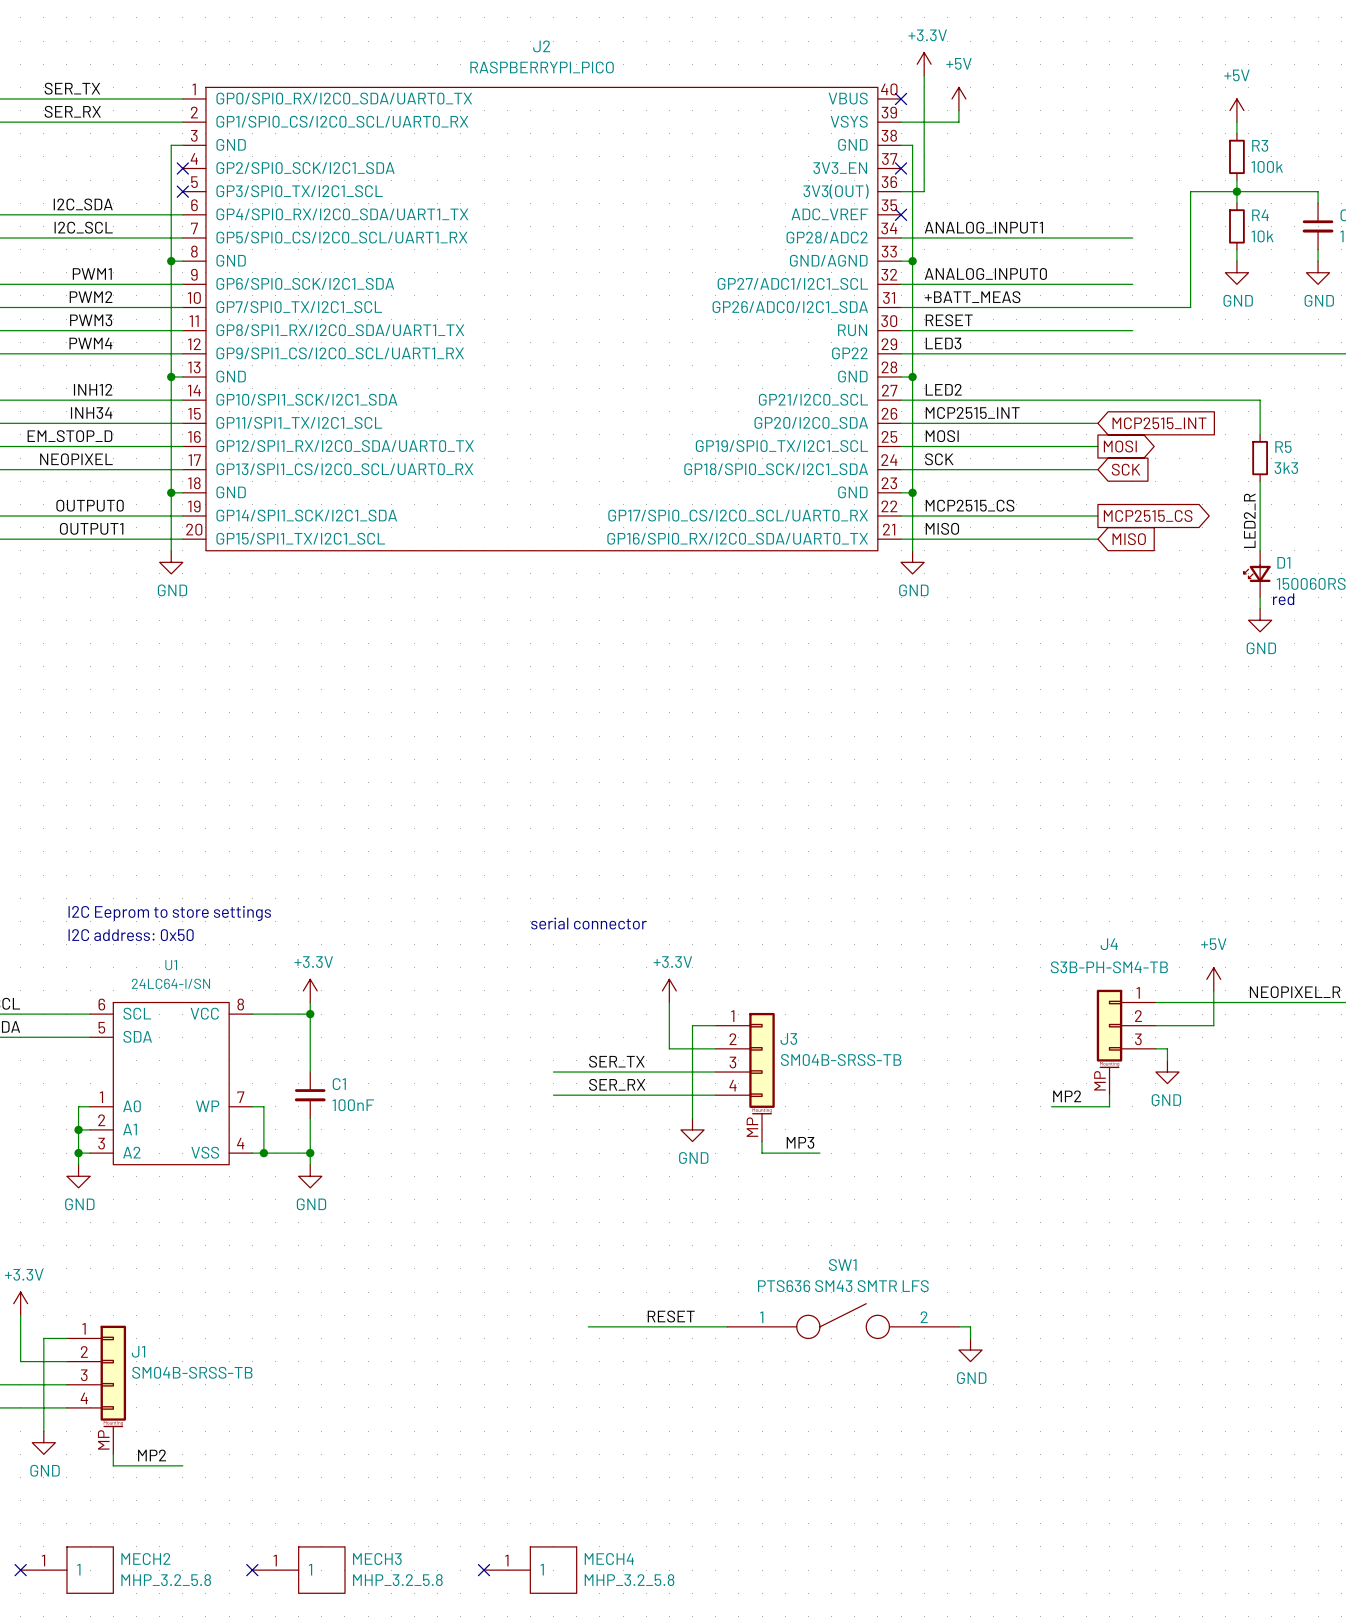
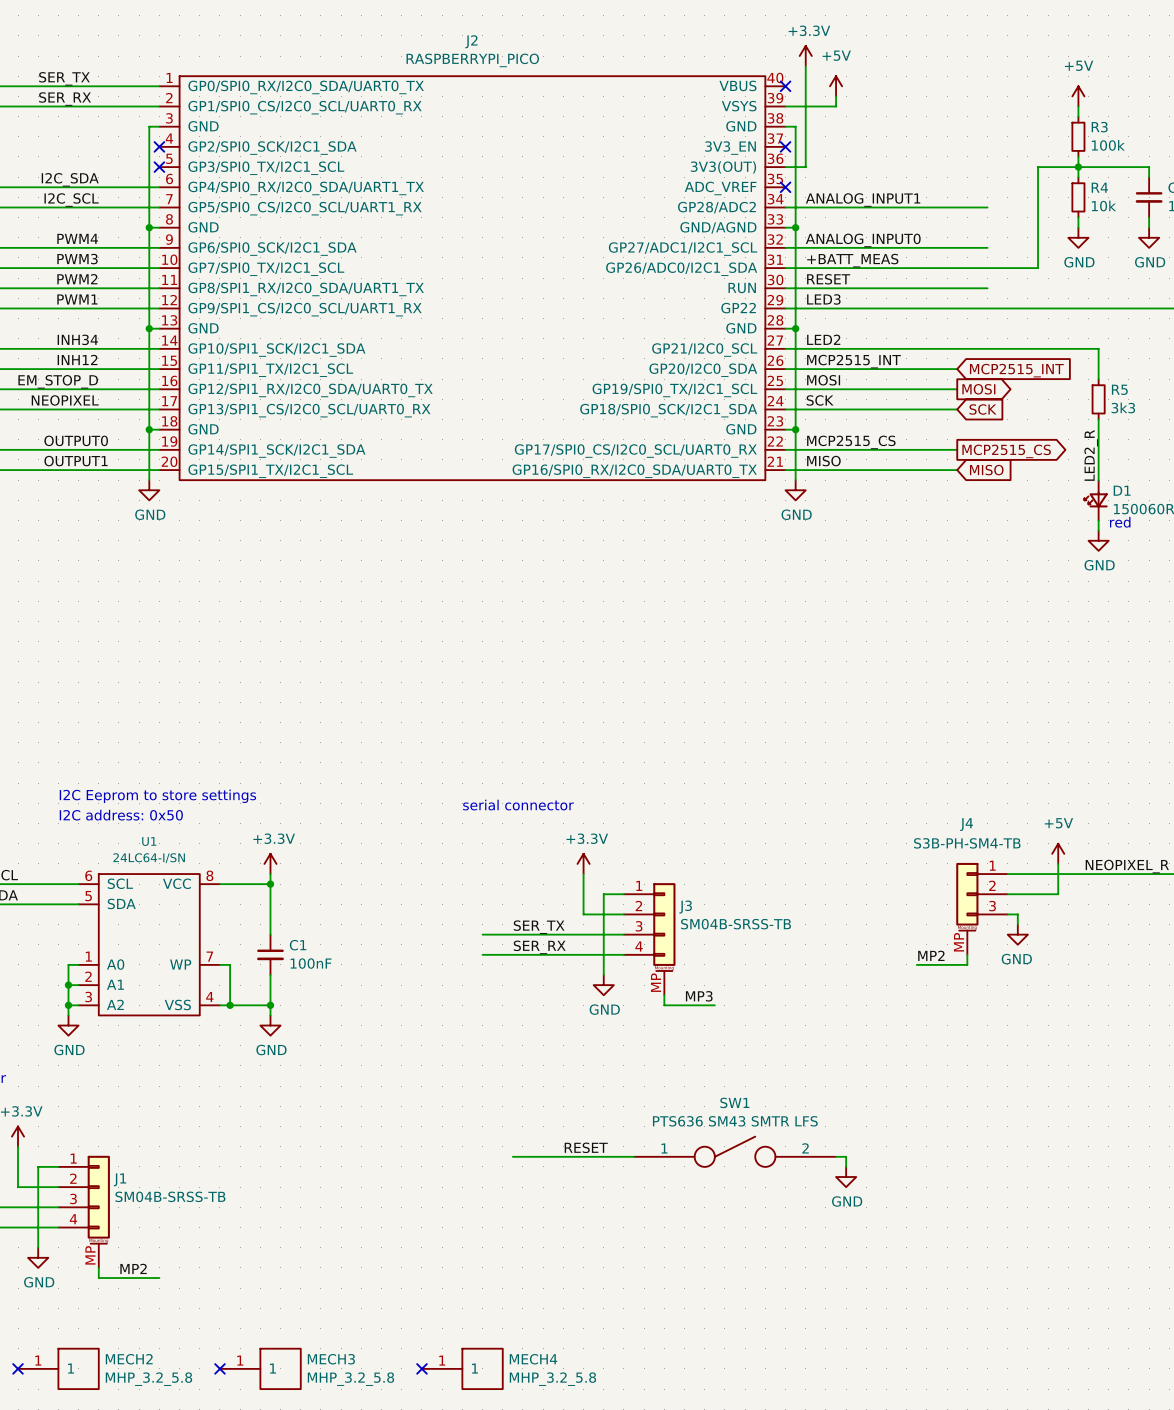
label: PWM1 (92, 273) -> PWM4 (77, 238)
label: PWM2 (91, 297) -> PWM3 (77, 259)
label: PWM3 (91, 320) -> PWM2 (77, 279)
label: PWM4 (90, 343) -> PWM1 (77, 299)
label: INH12 (93, 389) -> INH34 (77, 339)
label: INH34 (91, 413) -> INH12 (77, 359)

